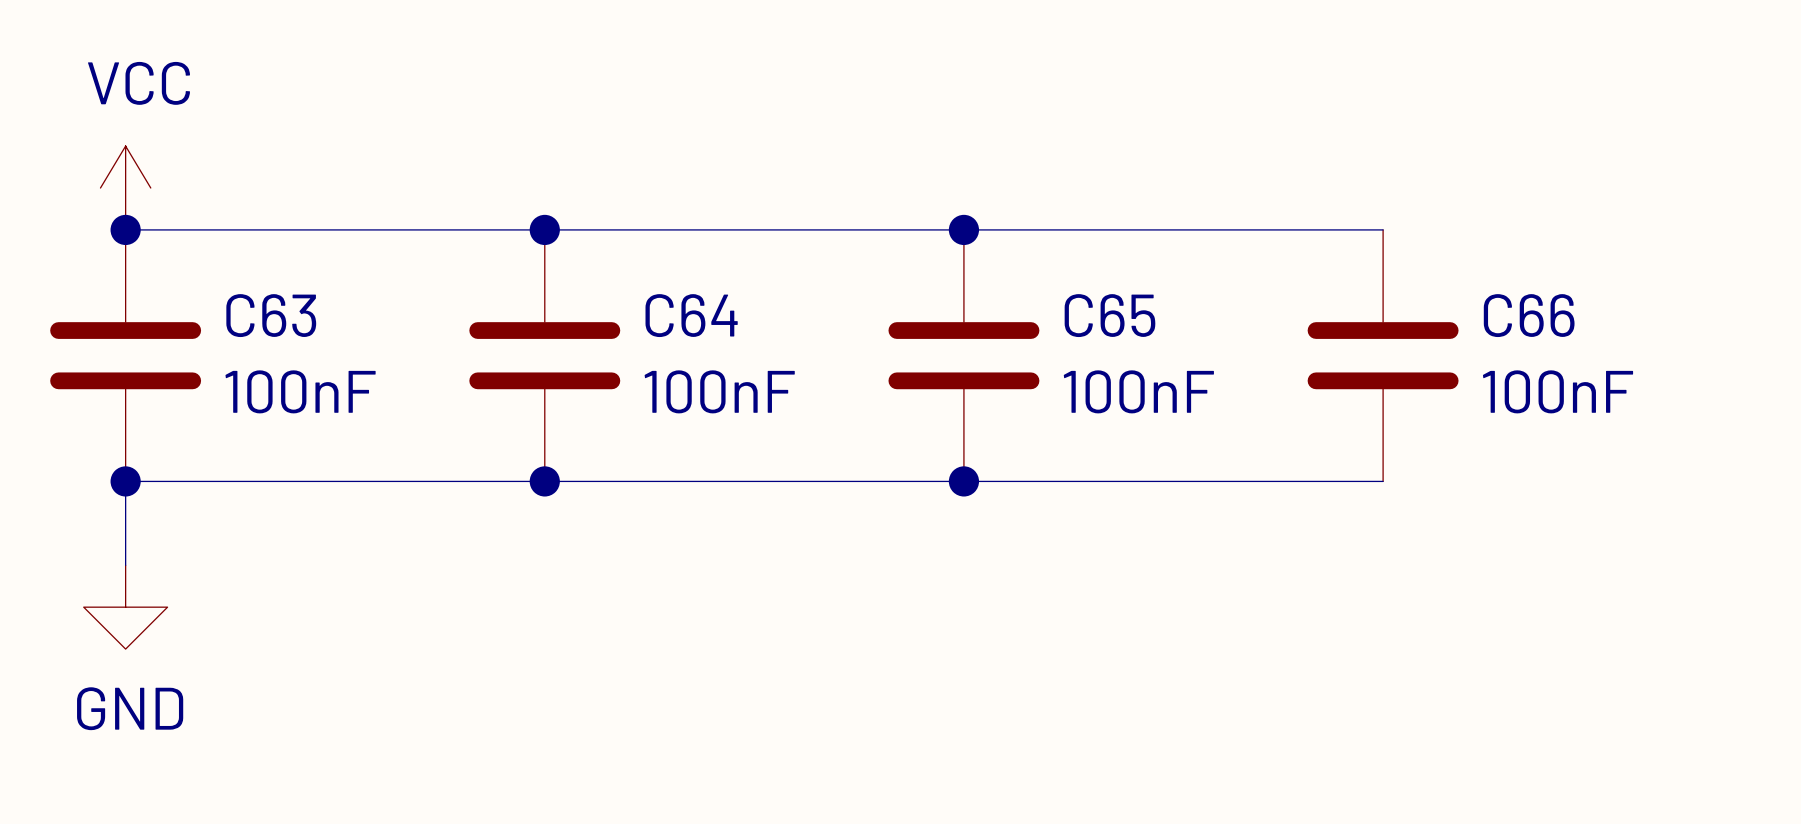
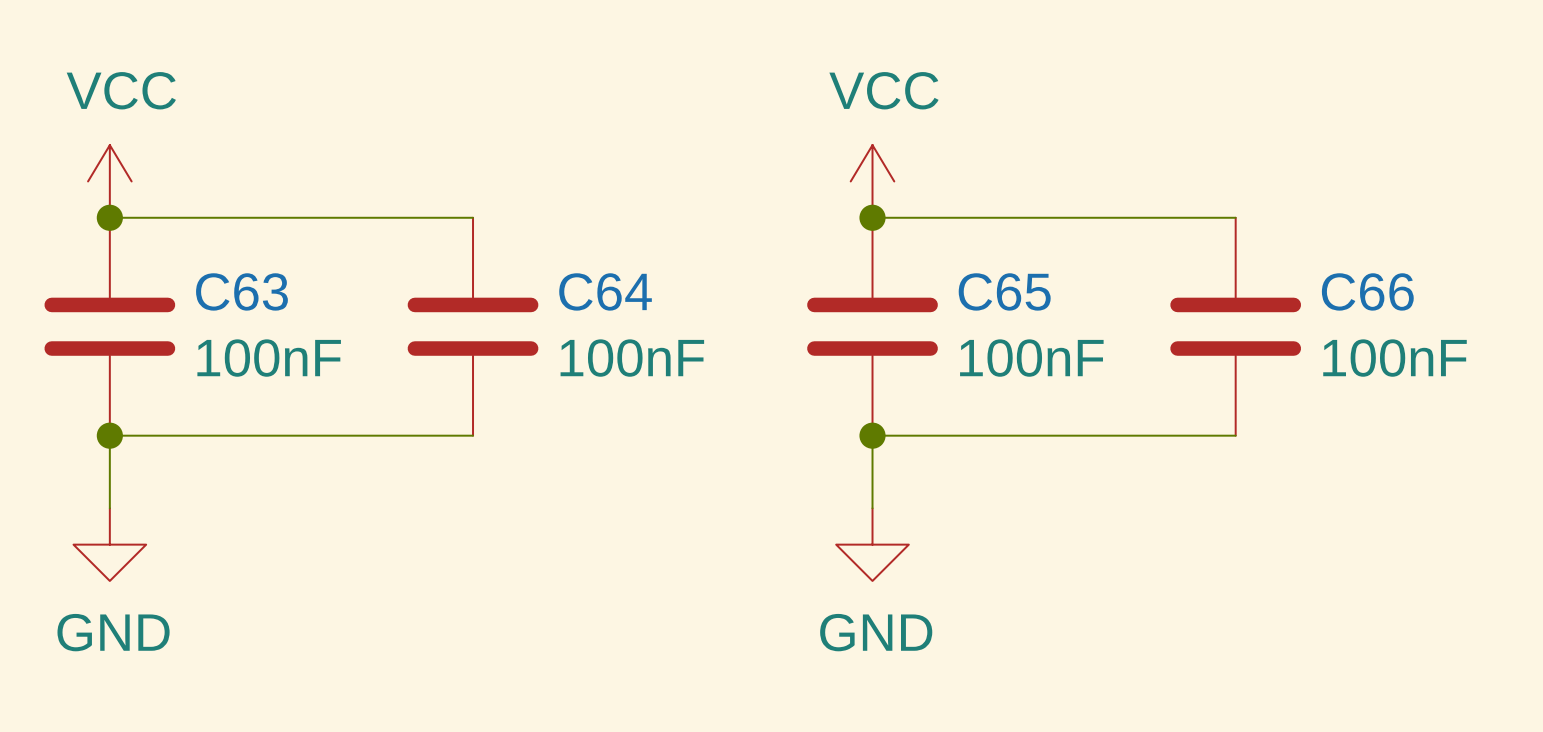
power symbol: none -> VCC (872, 181)
wire: (544, 229) (1005, 229) -> none
junction: (544, 229) -> none
junction position: (963, 229) -> (872, 217)
wire: none -> (1199, 217) (1235, 217)
C65 position: (963, 355) -> (872, 326)
C66 position: (1383, 355) -> (1235, 326)
wire: (544, 481) (1005, 481) -> (872, 508) (872, 435)
junction: (544, 481) -> none
junction position: (963, 481) -> (872, 435)
wire: none -> (1199, 435) (1235, 435)
power symbol: none -> GND (872, 544)

